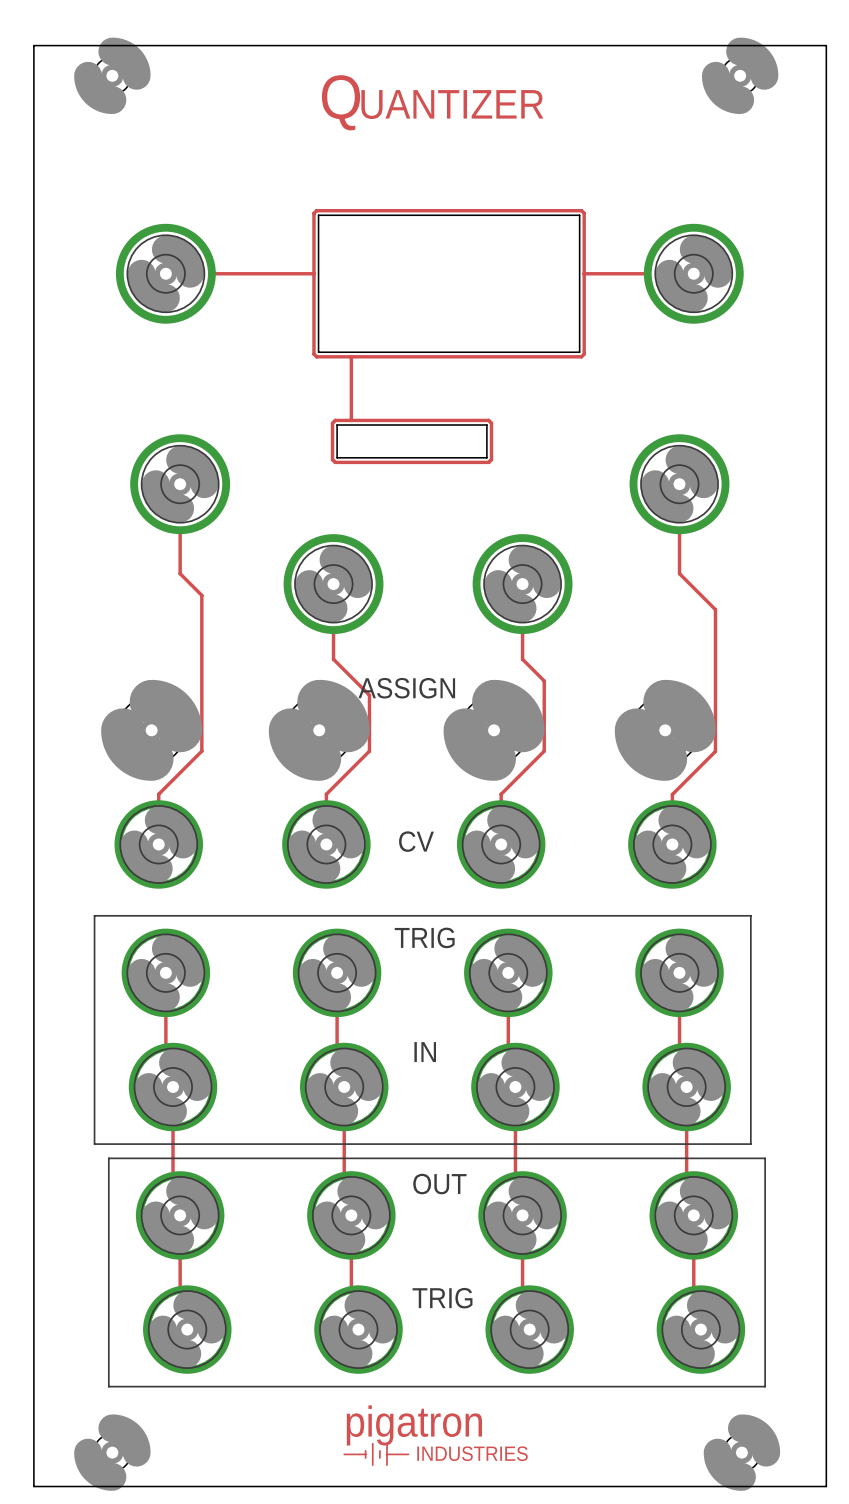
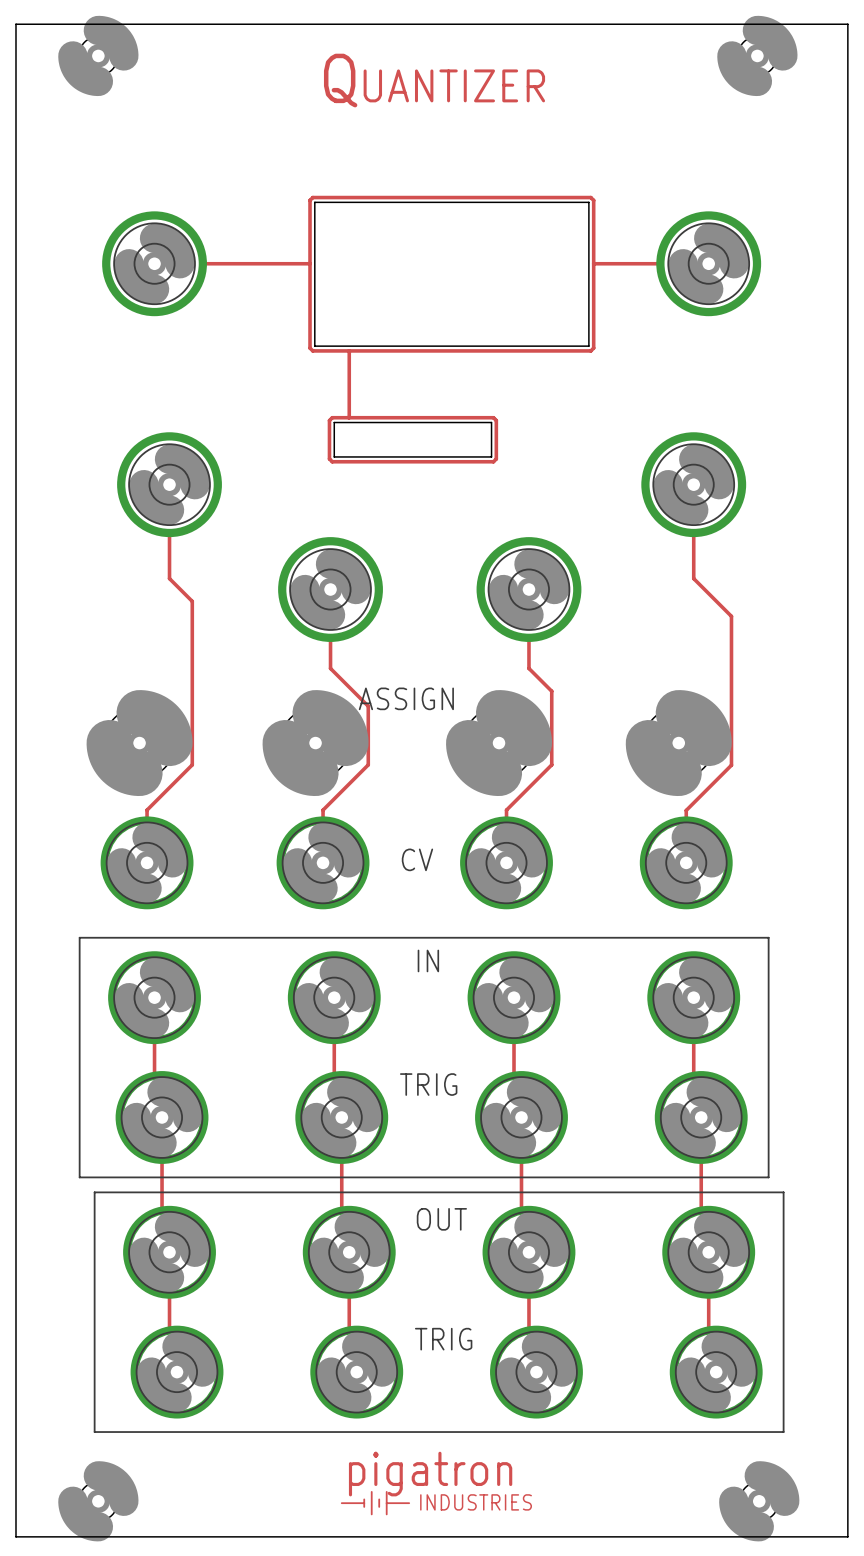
text position: TRIG (424, 937) -> TRIG (428, 1084)
text position: IN (425, 1052) -> IN (428, 960)

